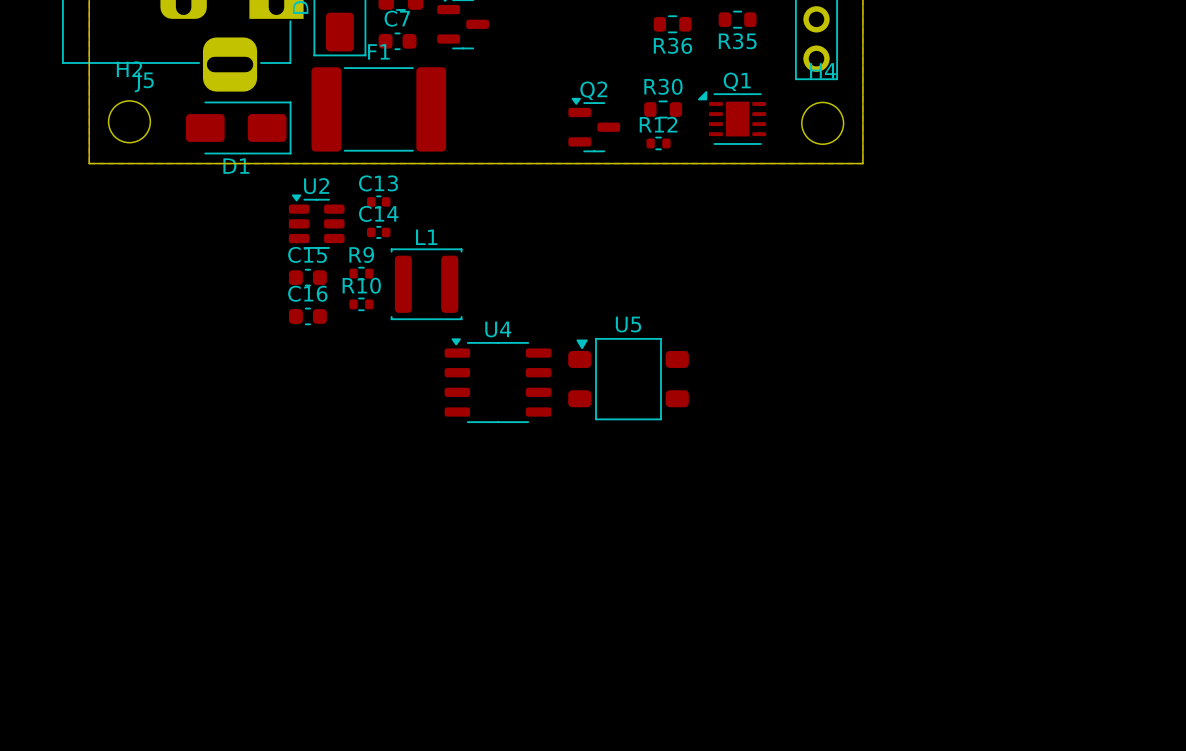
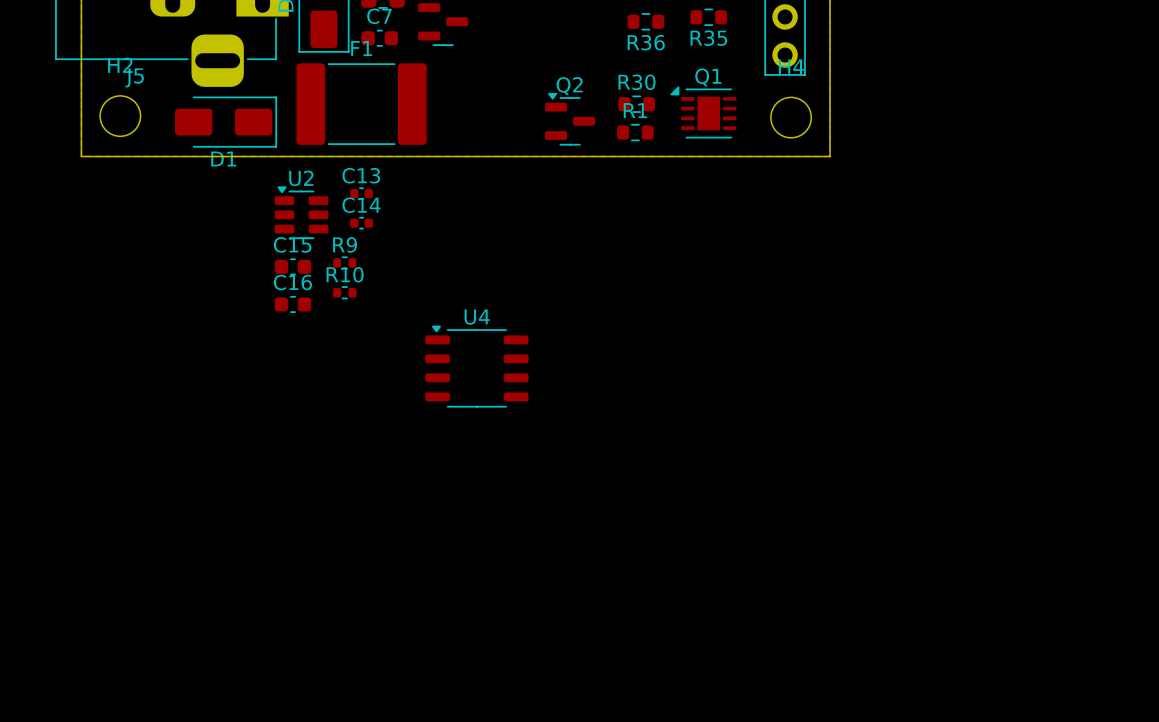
R1: none -> (635, 132)
R12: (658, 143) -> none
L1: (426, 284) -> none
U5: (628, 379) -> none

